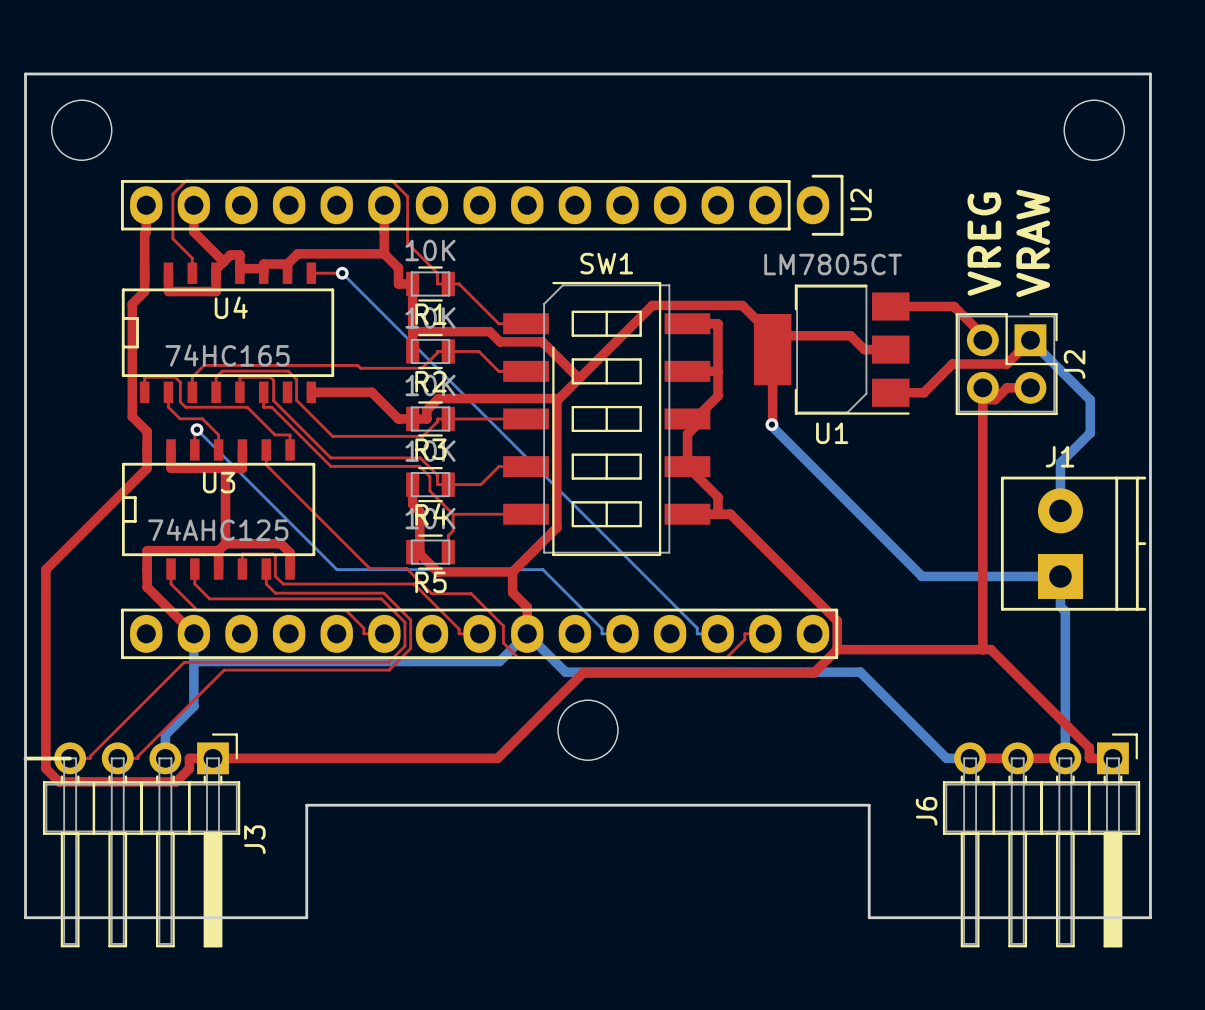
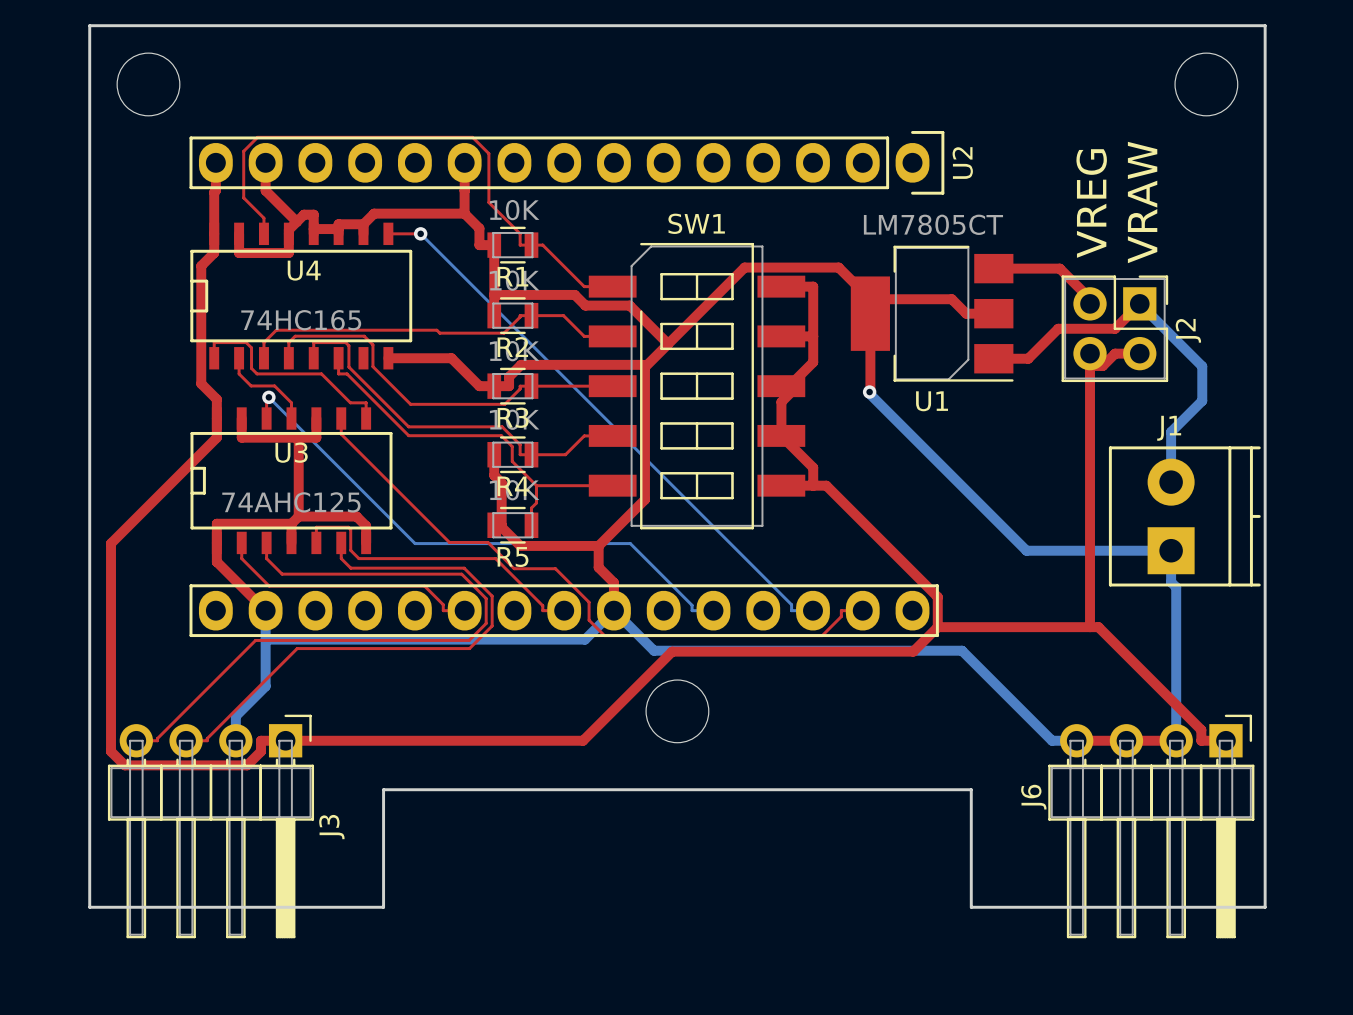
line: (25, 758) (69, 758) -> none

